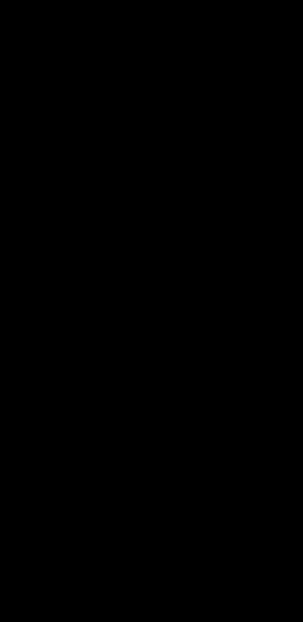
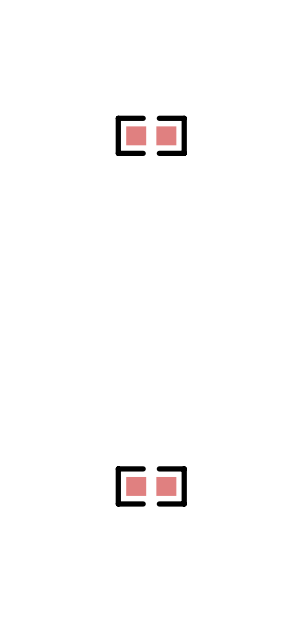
part: none -> (151, 135)
part: none -> (151, 486)

